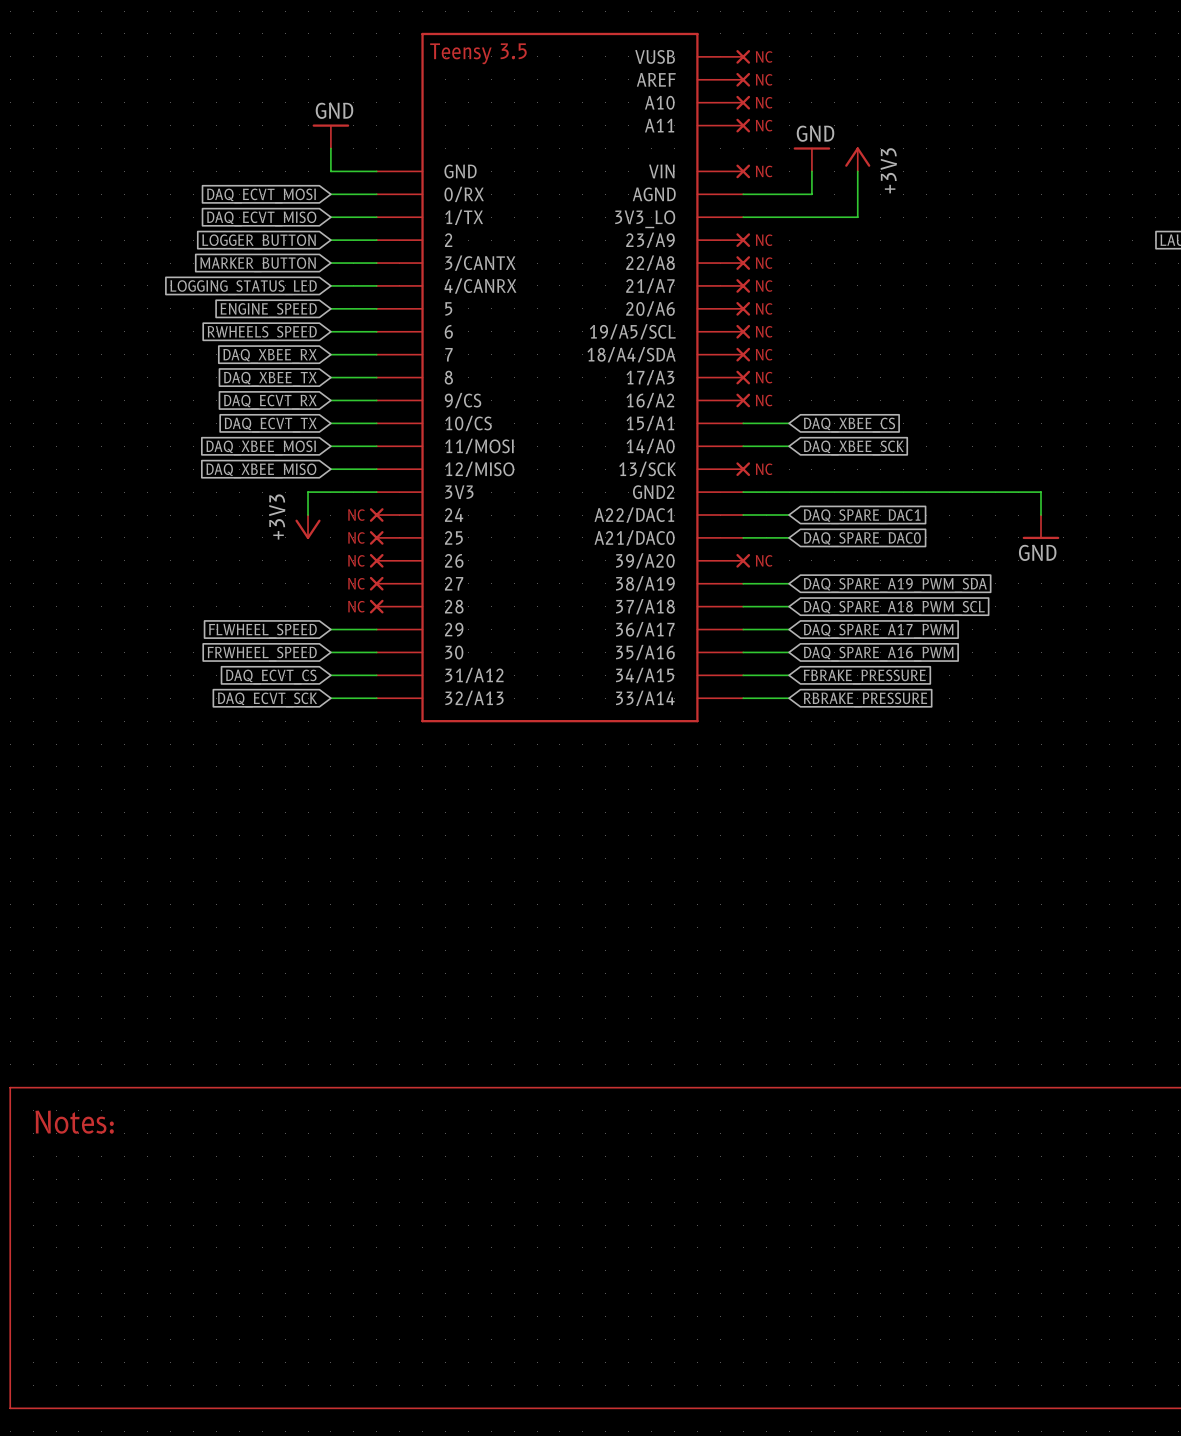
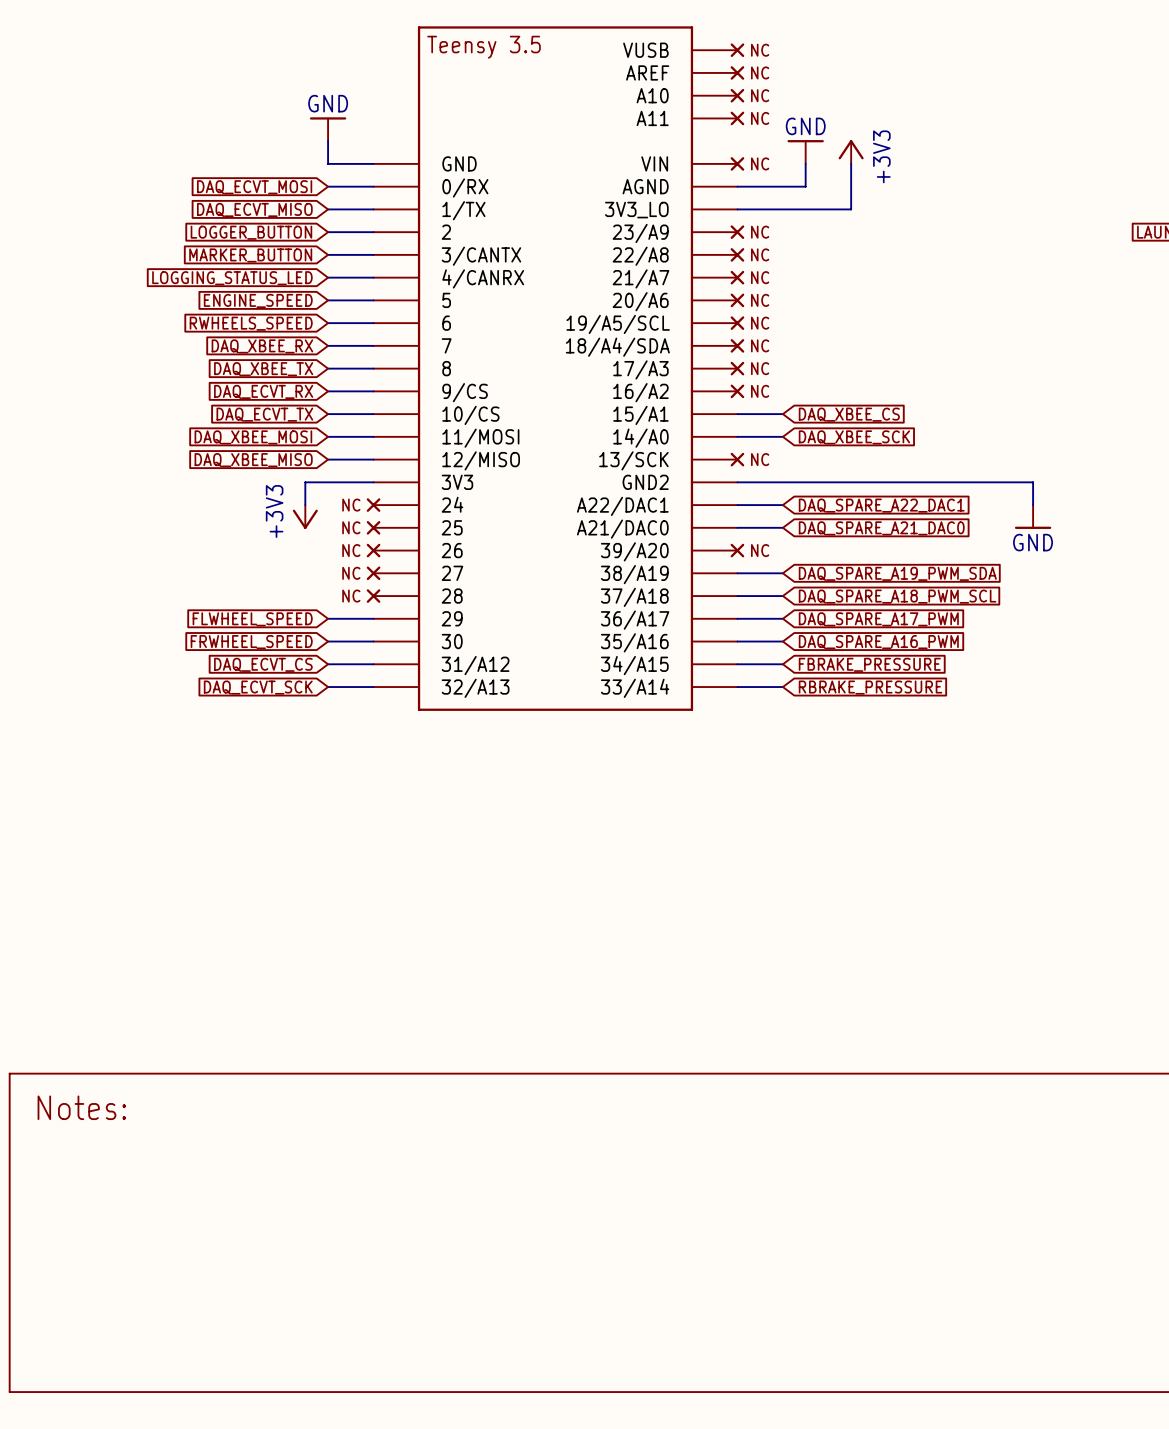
global label: DAQ_SPARE_DAC1 (862, 516) -> DAQ_SPARE_A22_DAC1 (881, 505)
global label: DAQ_SPARE_DAC0 (862, 539) -> DAQ_SPARE_A21_DAC0 (881, 528)

